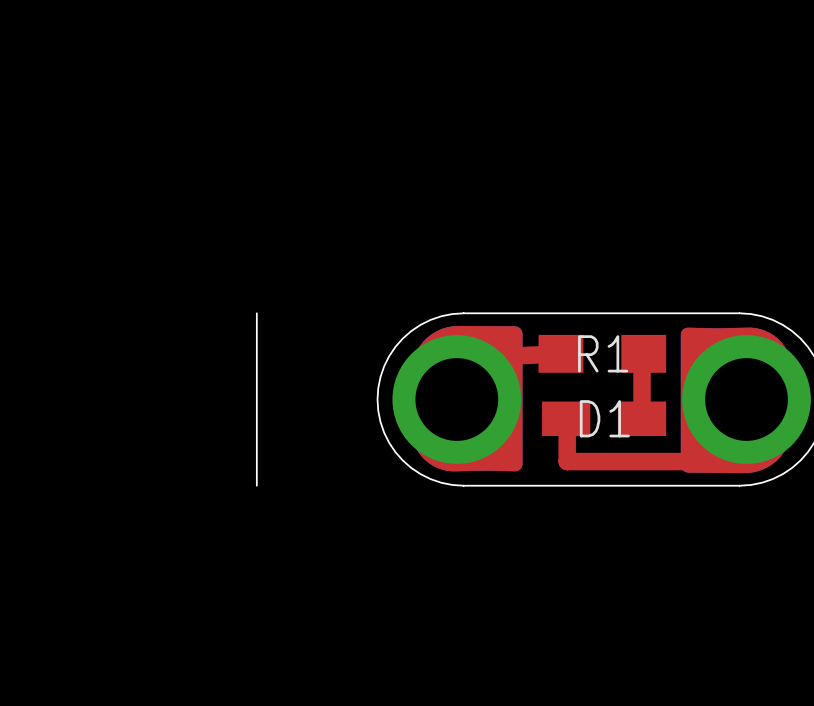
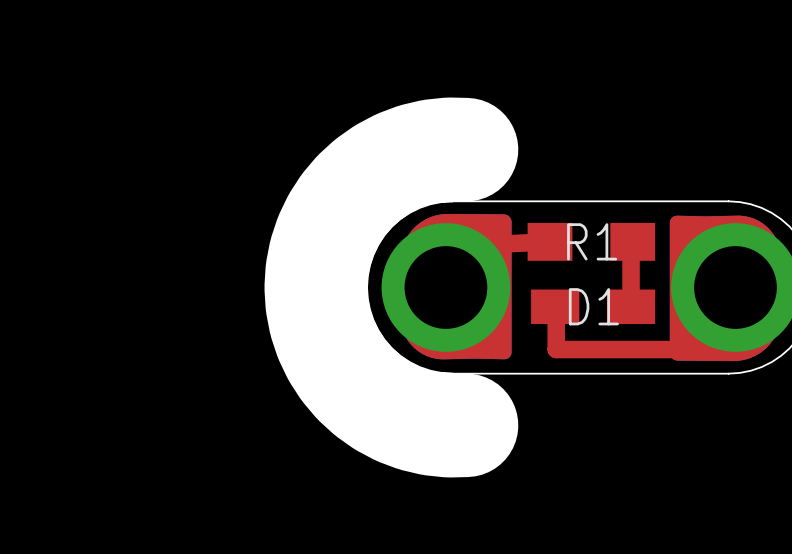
board edge: none -> (466, 149) (431, 151) (397, 161) (382, 169) (354, 191) (333, 219) (326, 235) (320, 252) (316, 287) (320, 322) (326, 339) (333, 355) (354, 383) (382, 405) (397, 413) (431, 423) (466, 425)
board edge: (256, 313) (256, 485) -> none
board edge: none -> (366, 201) (452, 201)
board edge: none -> (366, 373) (452, 373)

